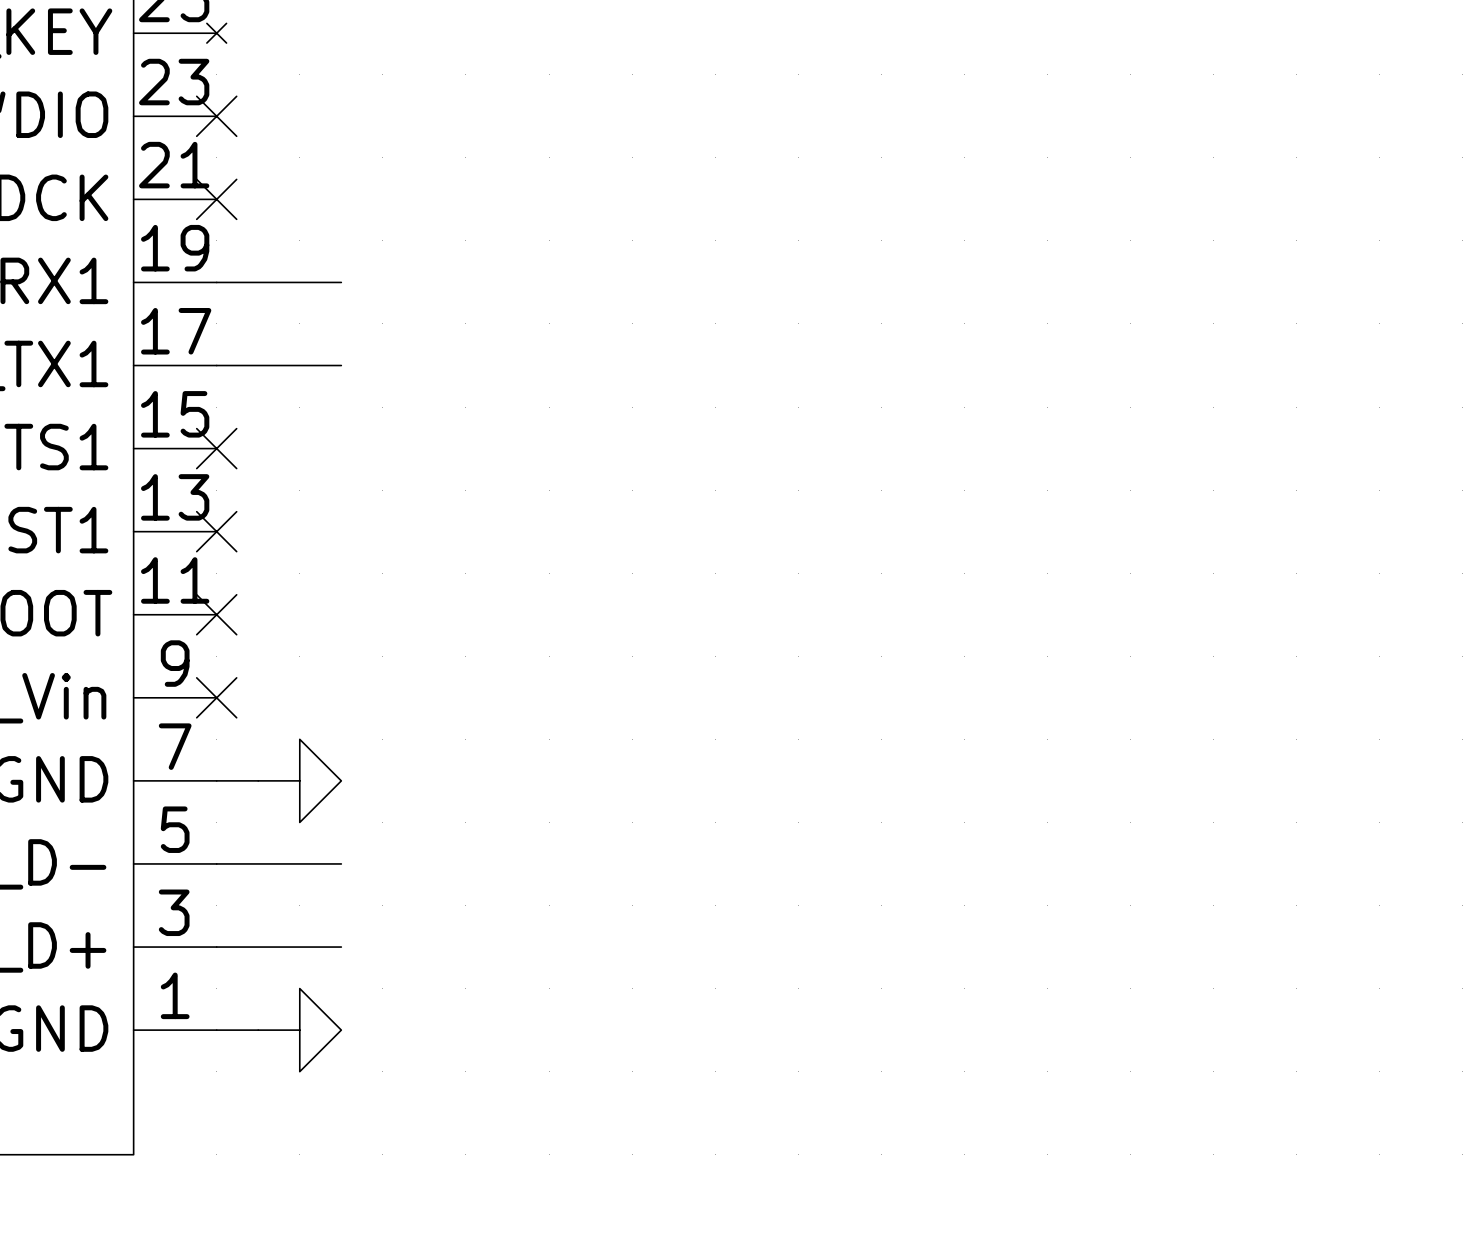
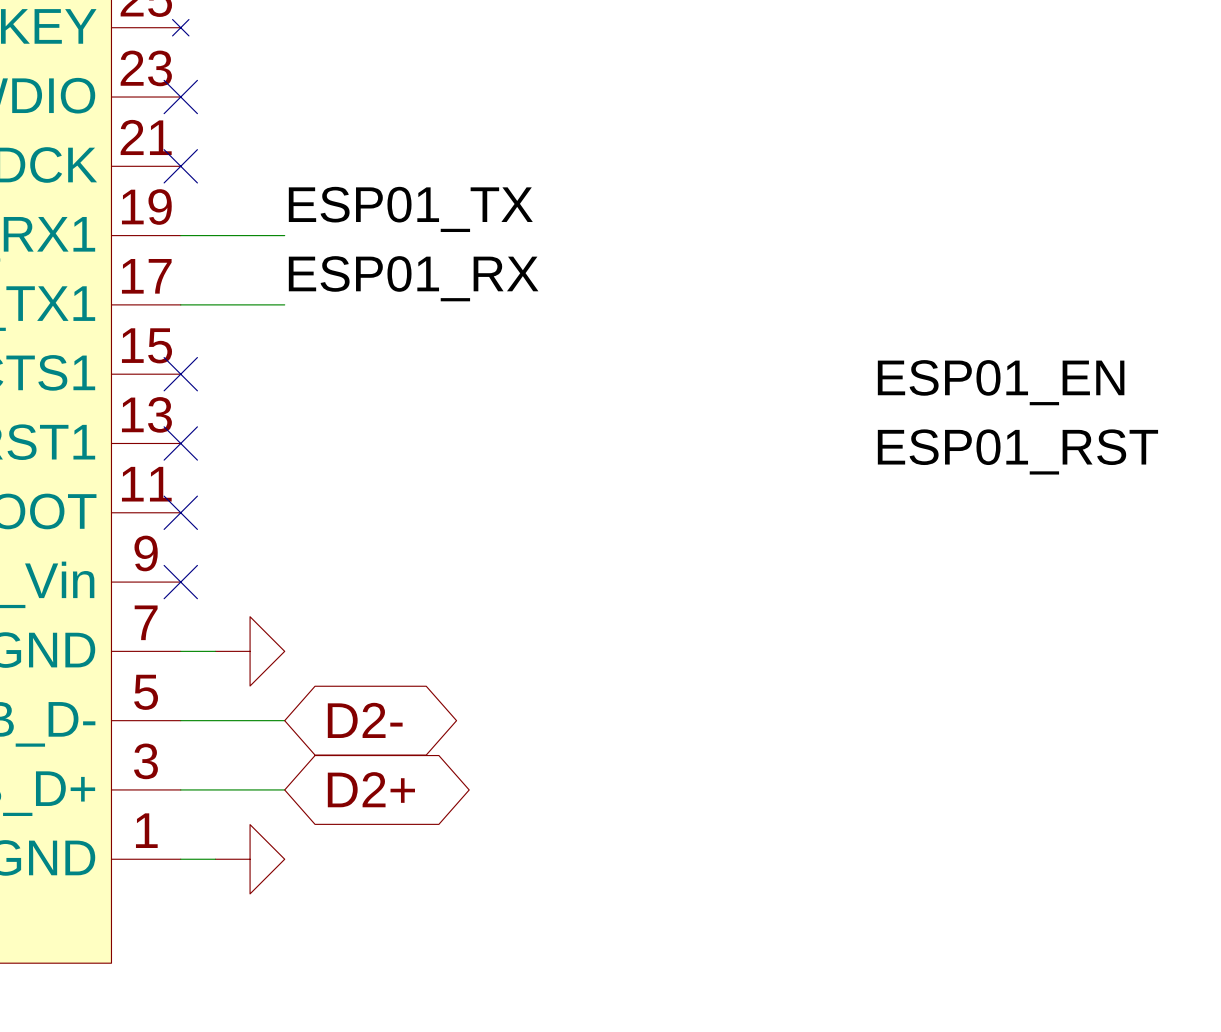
label: none -> ESP01_TX (410, 209)
label: none -> ESP01_RX (413, 278)
label: none -> ESP01_EN (1001, 382)
label: none -> ESP01_RST (1017, 451)
global label: none -> D2- (365, 720)
global label: none -> D2+ (371, 789)

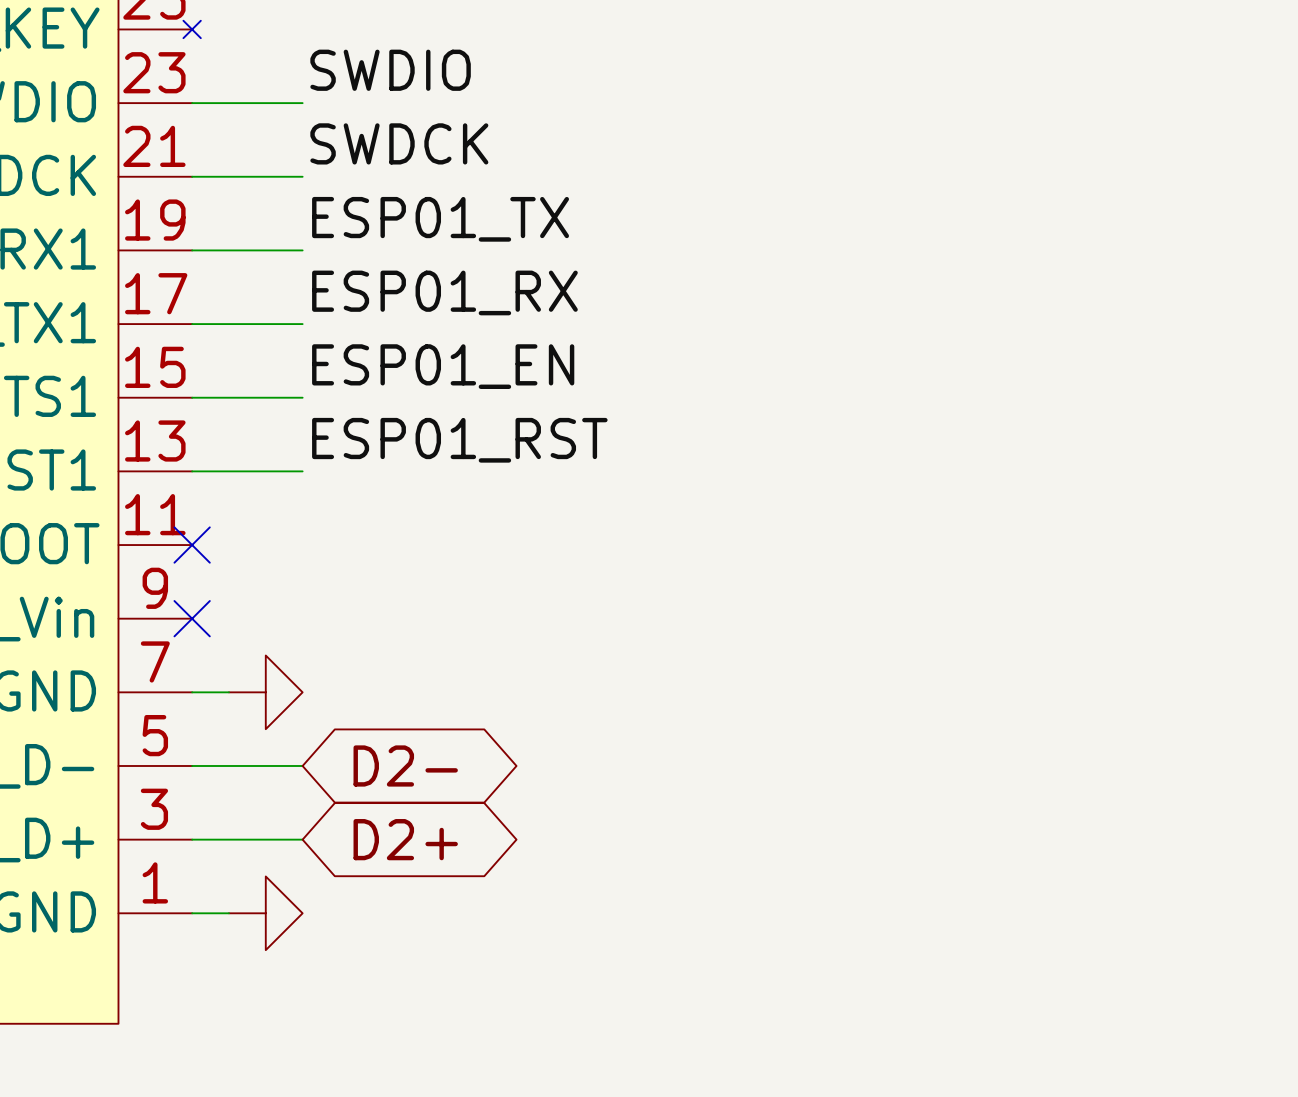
label: none -> SWDIO (390, 70)
wire: none -> (192, 103) (302, 103)
no-connect mark: (180, 97) -> none
label: none -> SWDCK (399, 143)
wire: none -> (192, 176) (302, 176)
no-connect mark: (180, 166) -> none
wire: none -> (192, 397) (302, 397)
no-connect mark: (180, 374) -> none
label position: ESP01_EN (1001, 382) -> ESP01_EN (443, 366)
wire: none -> (192, 471) (302, 471)
no-connect mark: (180, 443) -> none
label position: ESP01_RST (1017, 451) -> ESP01_RST (459, 440)

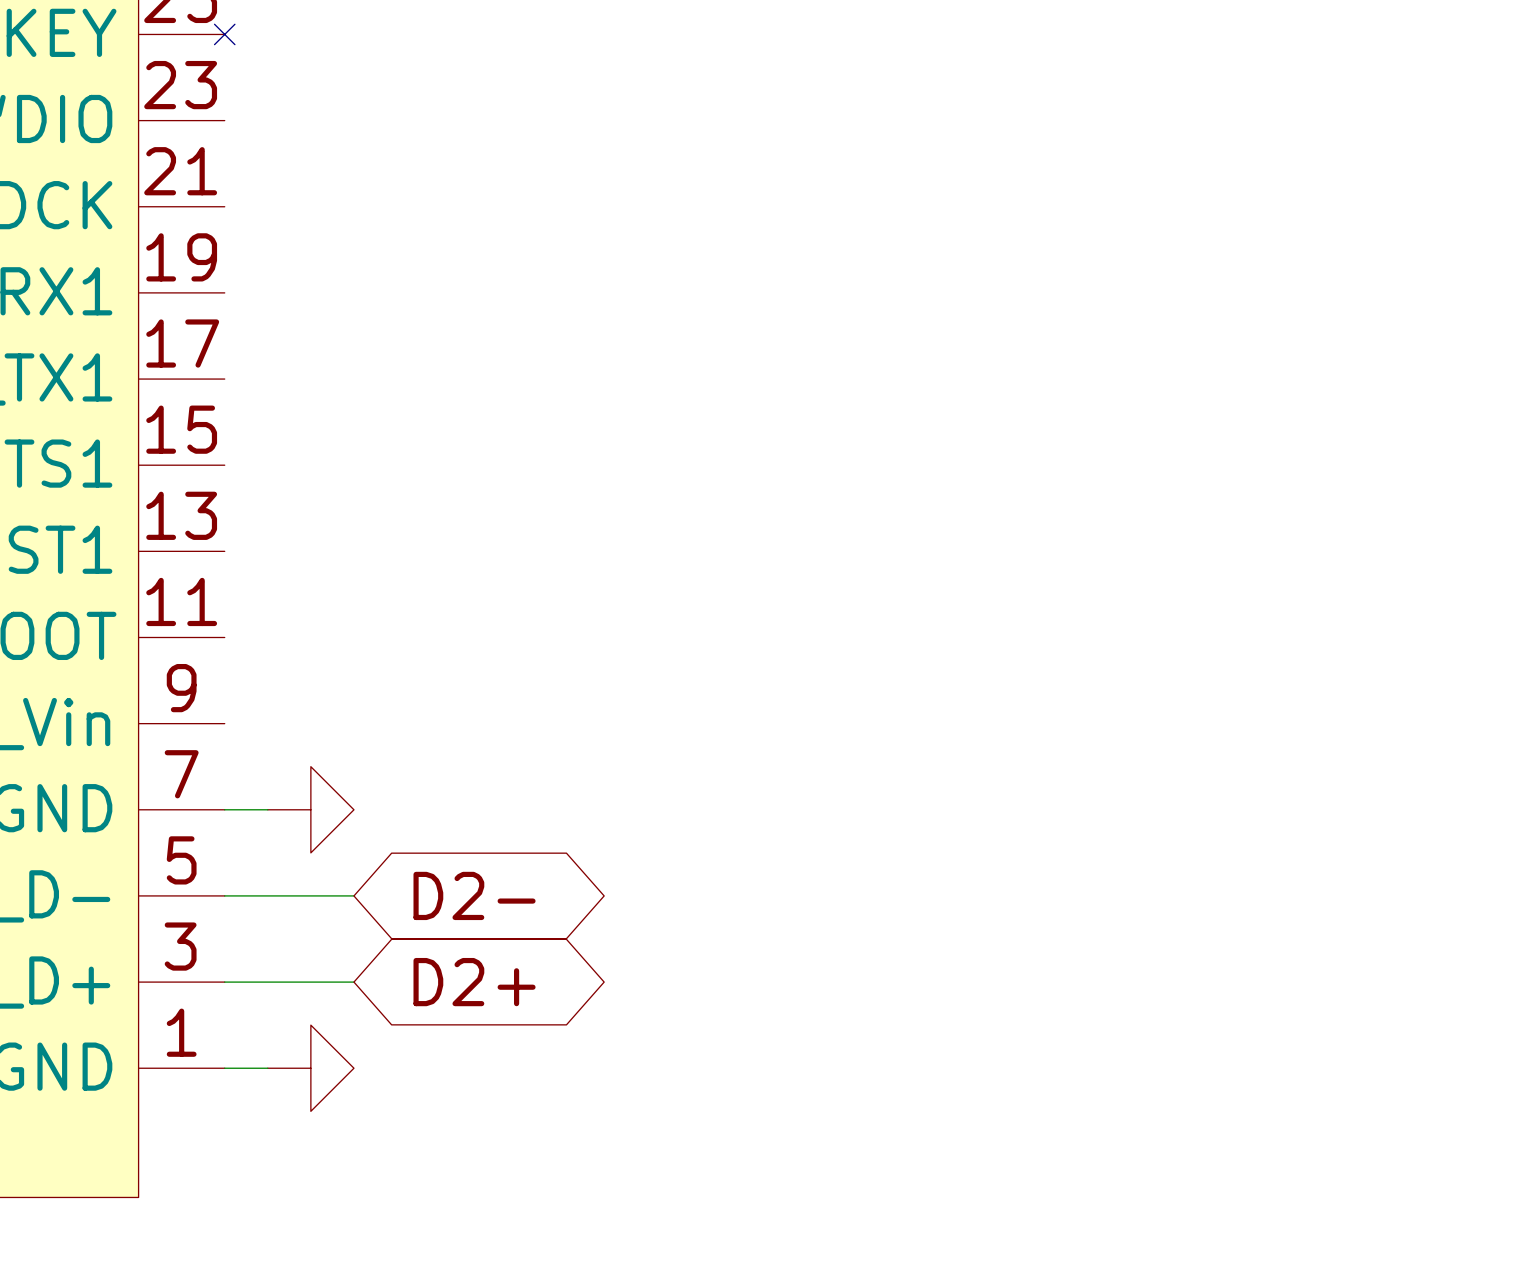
label: SWDIO (390, 70) -> none
wire: (192, 103) (302, 103) -> none
label: SWDCK (399, 143) -> none
wire: (192, 176) (302, 176) -> none
label: ESP01_TX (440, 219) -> none
wire: (192, 250) (302, 250) -> none
label: ESP01_RX (444, 292) -> none
wire: (192, 324) (302, 324) -> none
label: ESP01_EN (443, 366) -> none
wire: (192, 397) (302, 397) -> none
label: ESP01_RST (459, 440) -> none
wire: (192, 471) (302, 471) -> none
no-connect mark: (192, 545) -> none
no-connect mark: (192, 618) -> none

